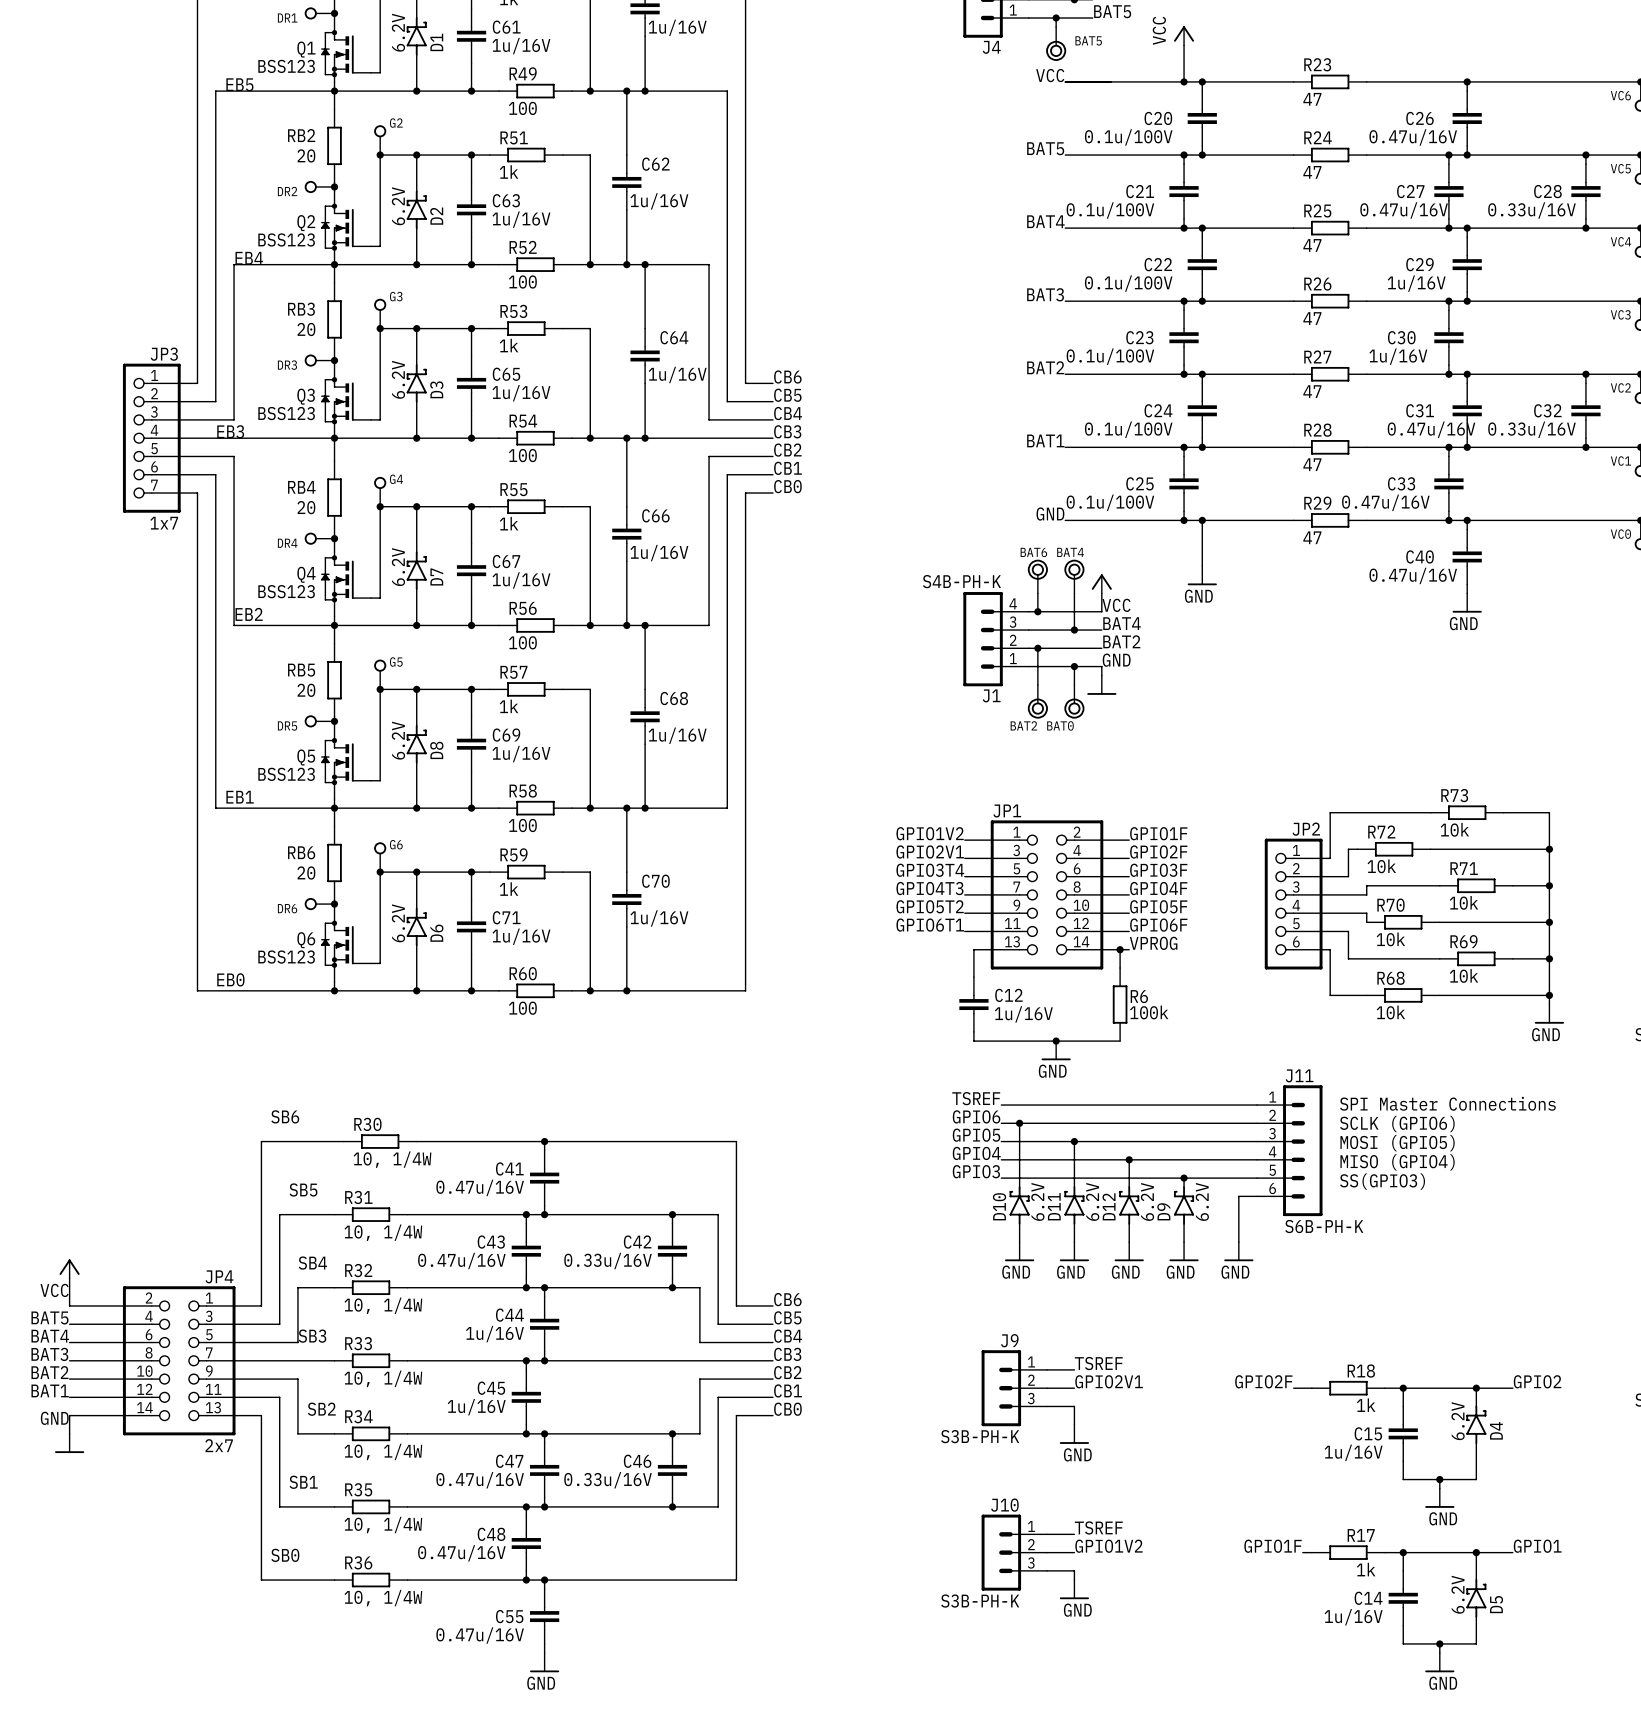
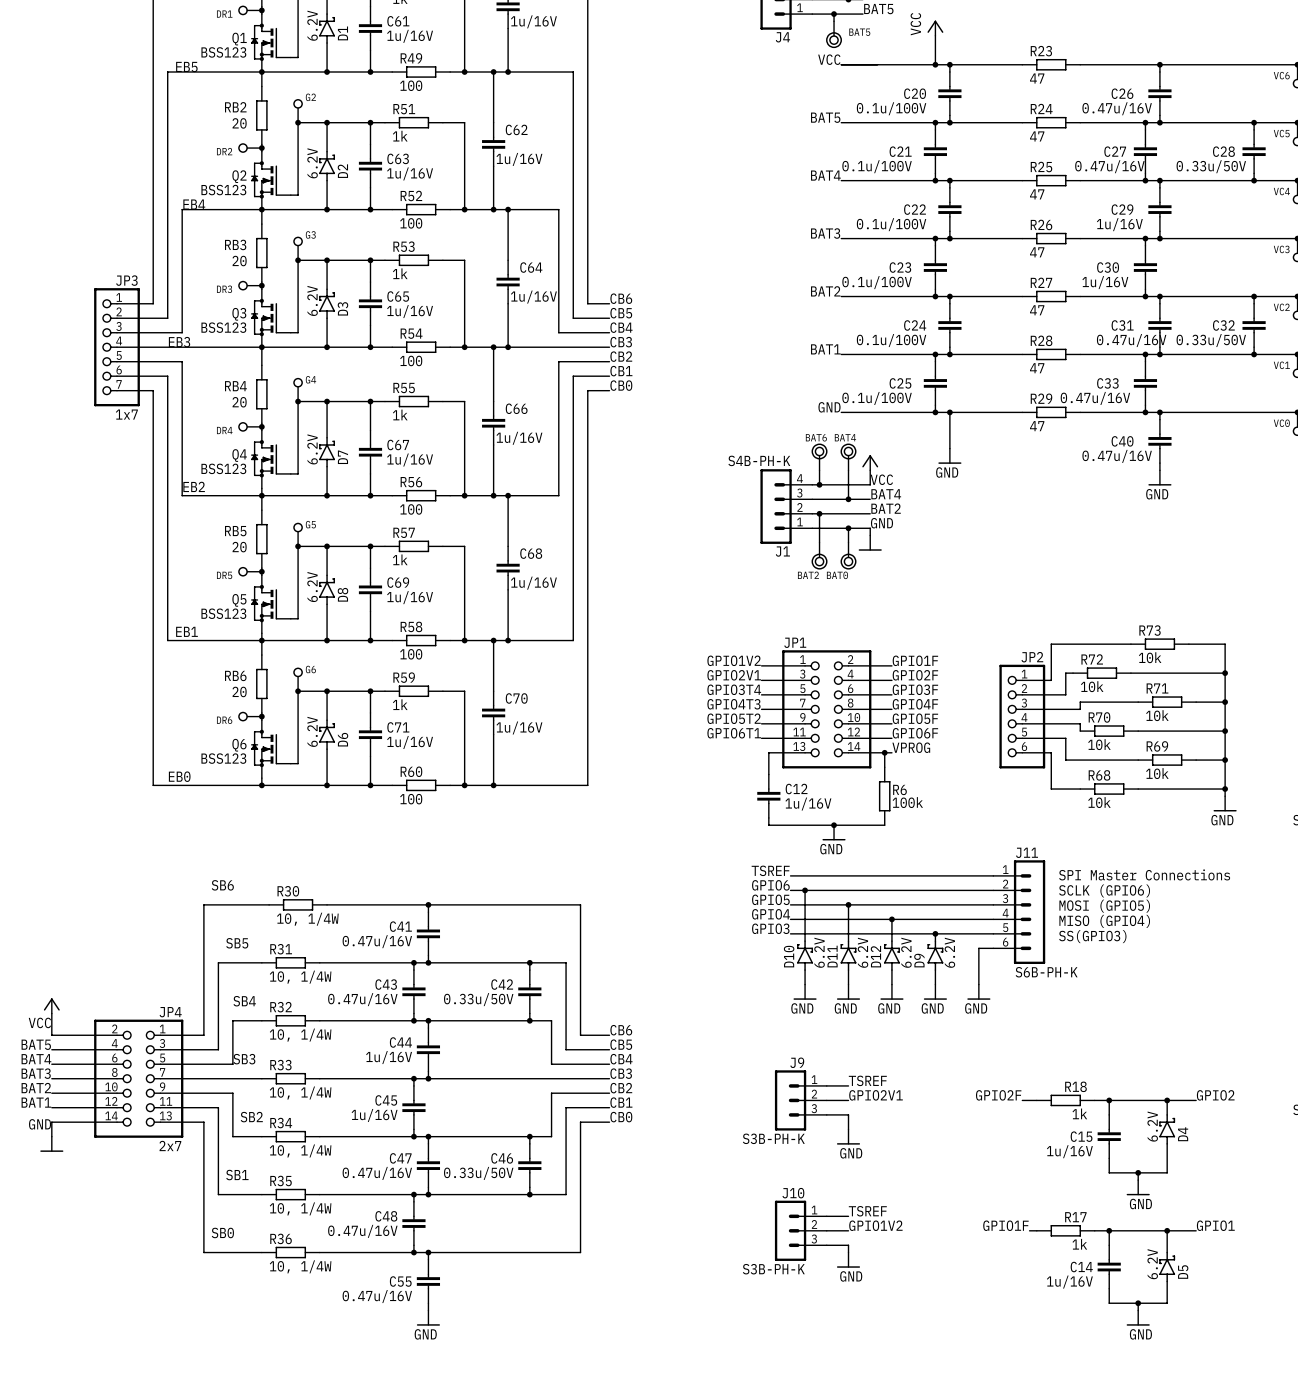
C28 value: 0.33u/16V (1531, 210) -> 0.33u/50V (1211, 166)
C32 value: 0.33u/16V (1531, 429) -> 0.33u/50V (1211, 340)
C42 value: 0.33u/16V (608, 1261) -> 0.33u/50V (478, 999)
C46 value: 0.33u/16V (608, 1480) -> 0.33u/50V (478, 1173)

